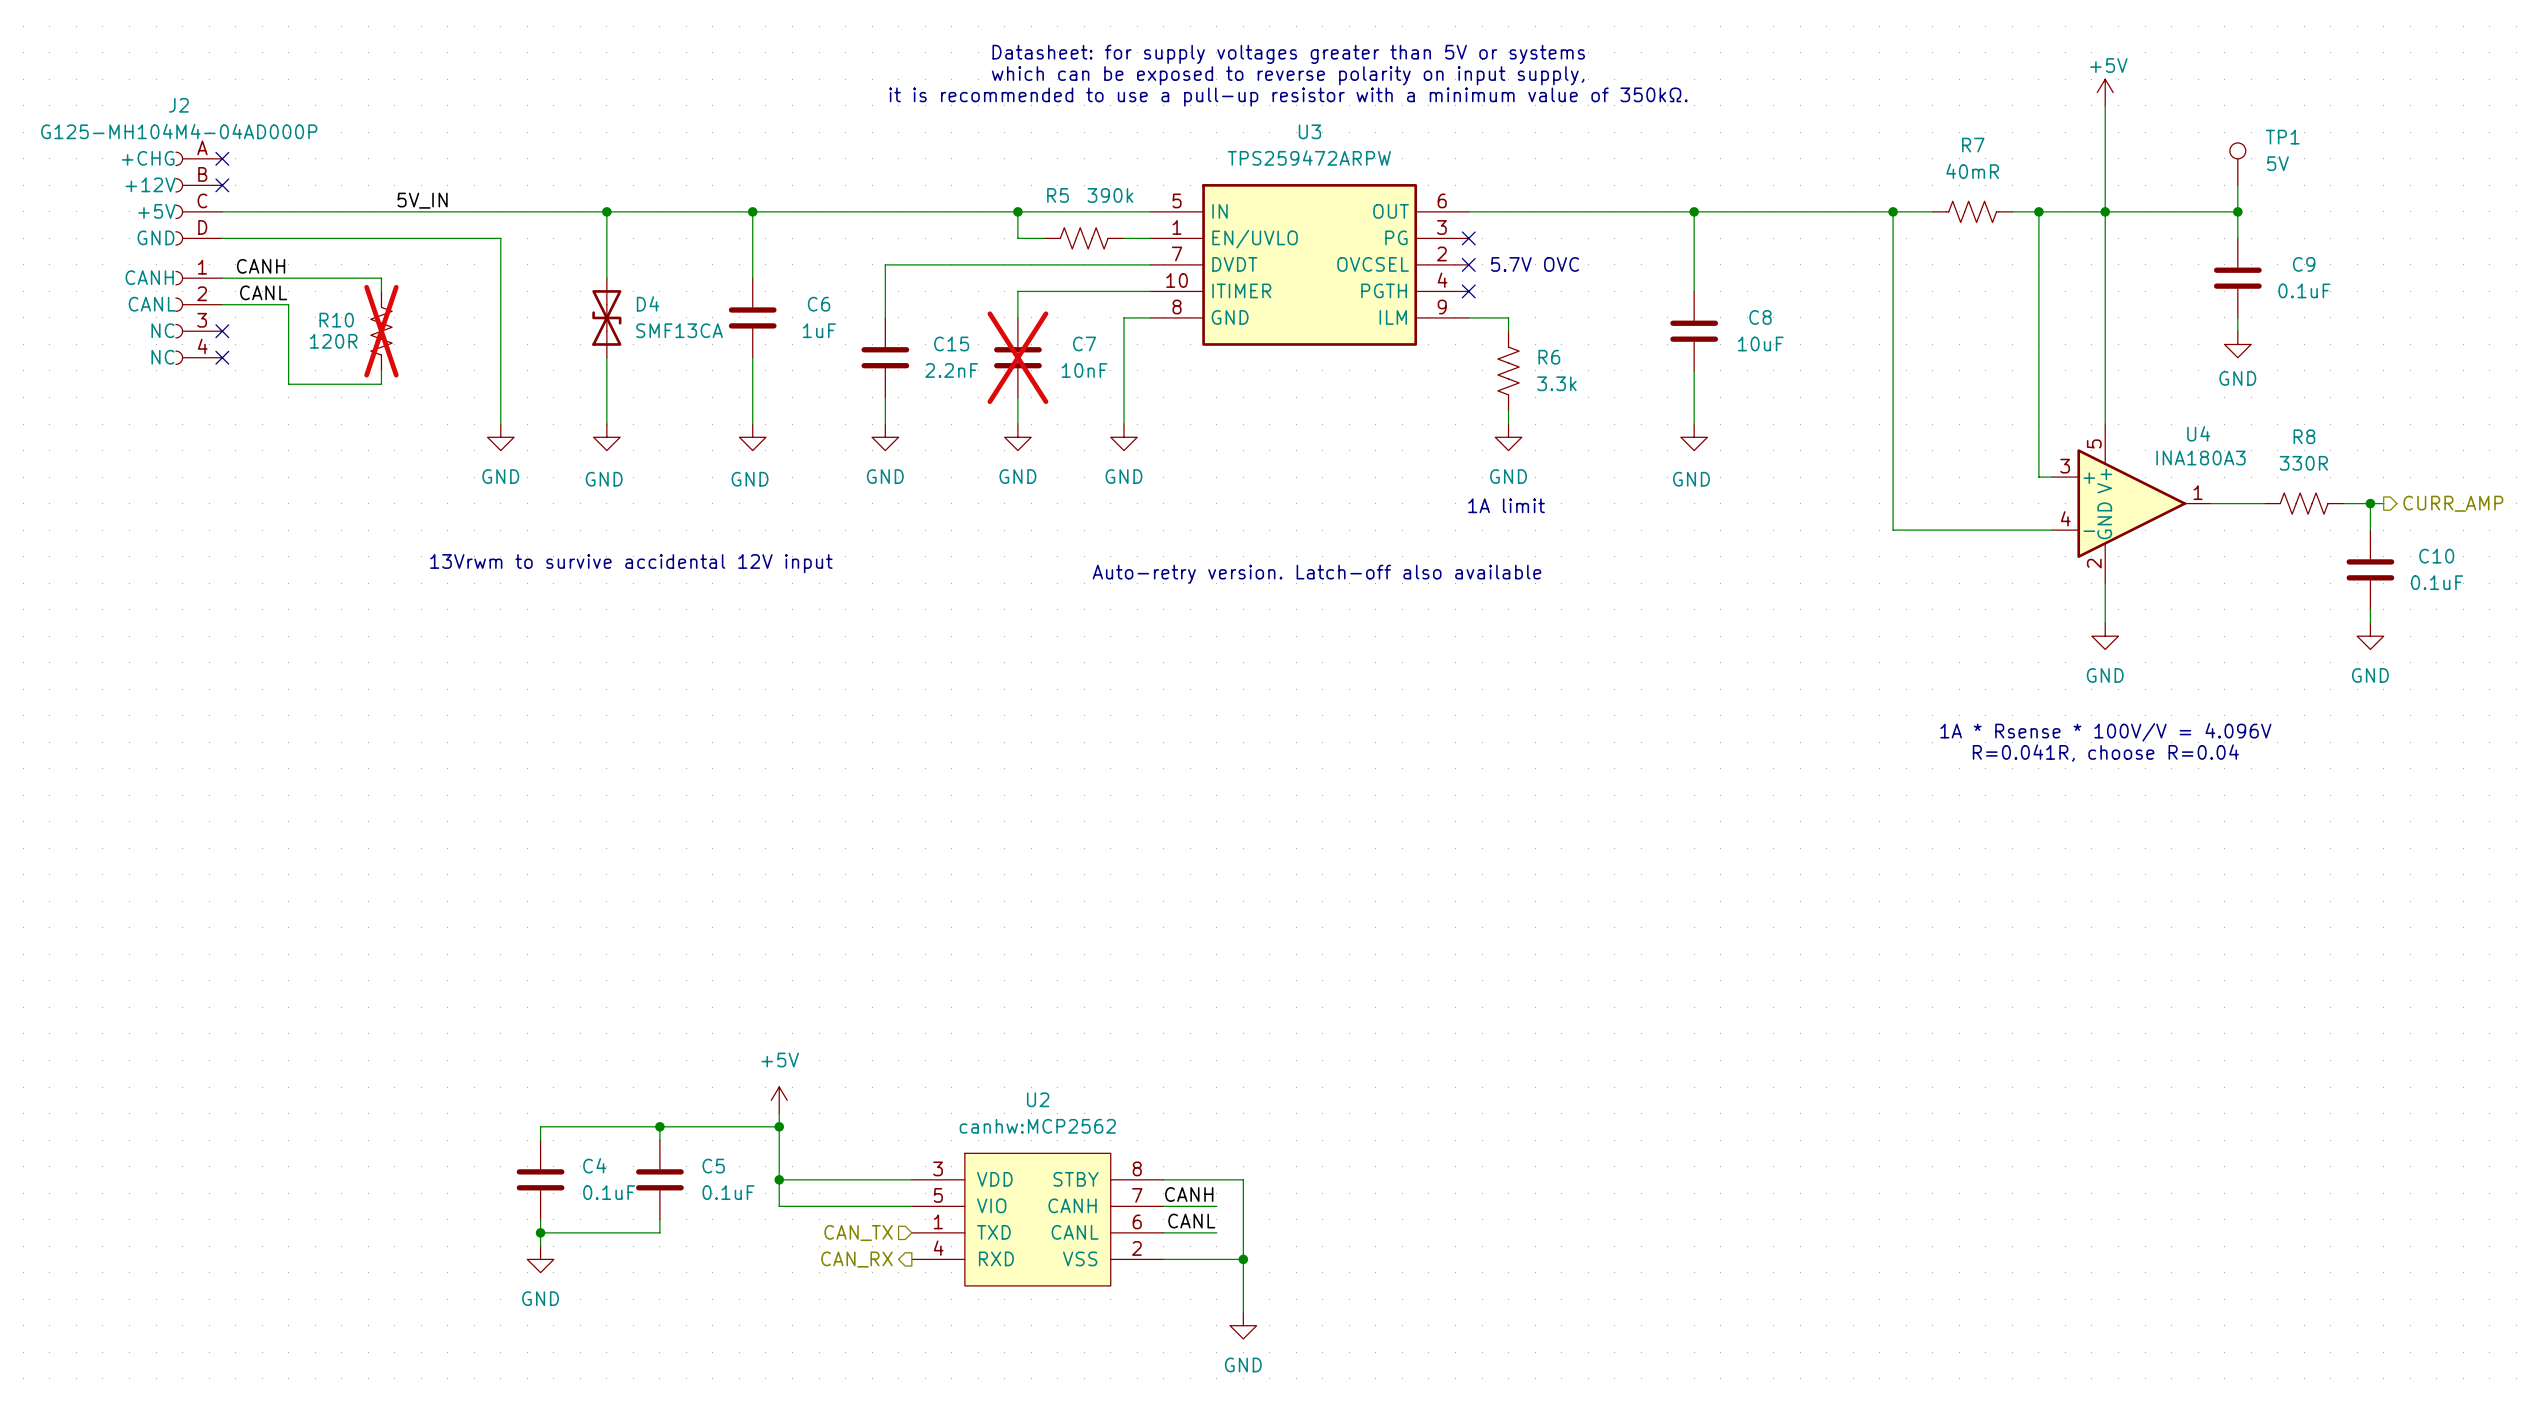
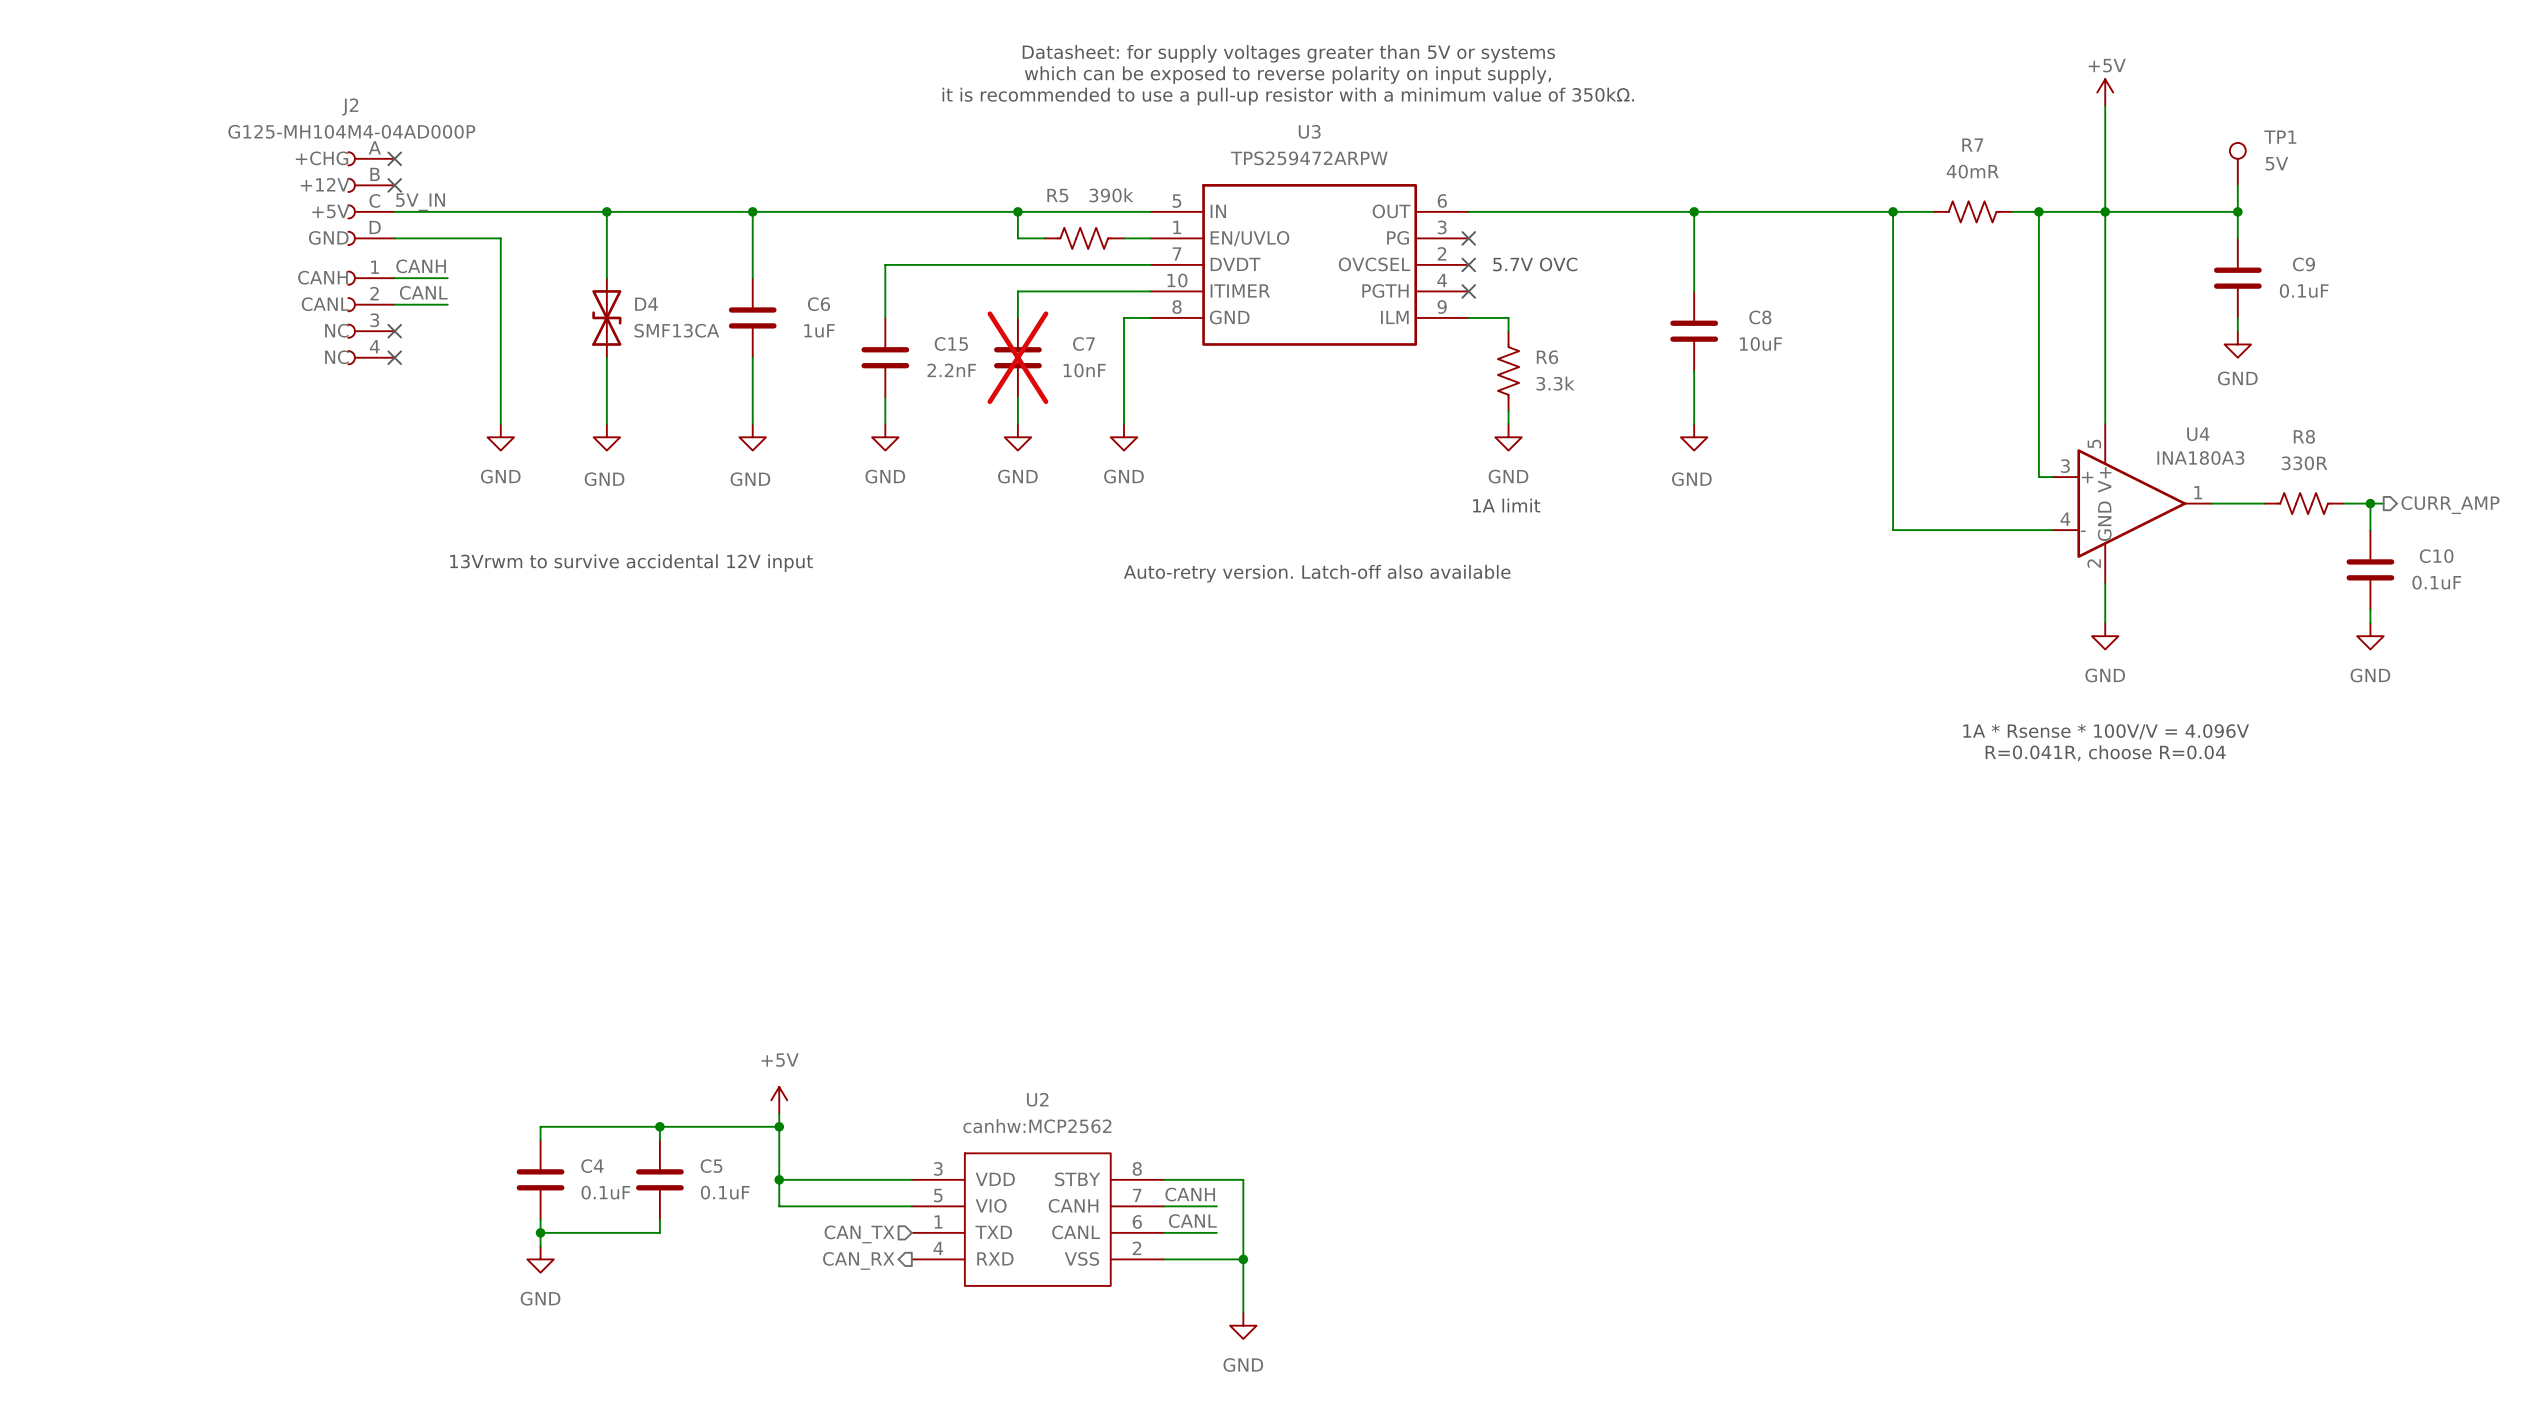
no-connect mark: (222, 158) -> none
no-connect mark: none -> (394, 158)
no-connect mark: (222, 185) -> none
no-connect mark: none -> (394, 185)
wire: (222, 211) (394, 211) -> none
wire: (222, 238) (394, 238) -> none
J2 position: (199, 258) -> (371, 258)
label position: CANH (261, 266) -> CANH (421, 266)
wire: (222, 278) (381, 278) (381, 291) -> none
wire: none -> (394, 278) (447, 278)
label position: CANL (263, 292) -> CANL (423, 292)
wire: (222, 304) (288, 304) (288, 384) (381, 384) (381, 370) -> none
wire: none -> (394, 304) (447, 304)
no-connect mark: (222, 331) -> none
R10: 120R (381, 331) -> none
no-connect mark: none -> (394, 331)
no-connect mark: (222, 357) -> none
no-connect mark: none -> (394, 357)

